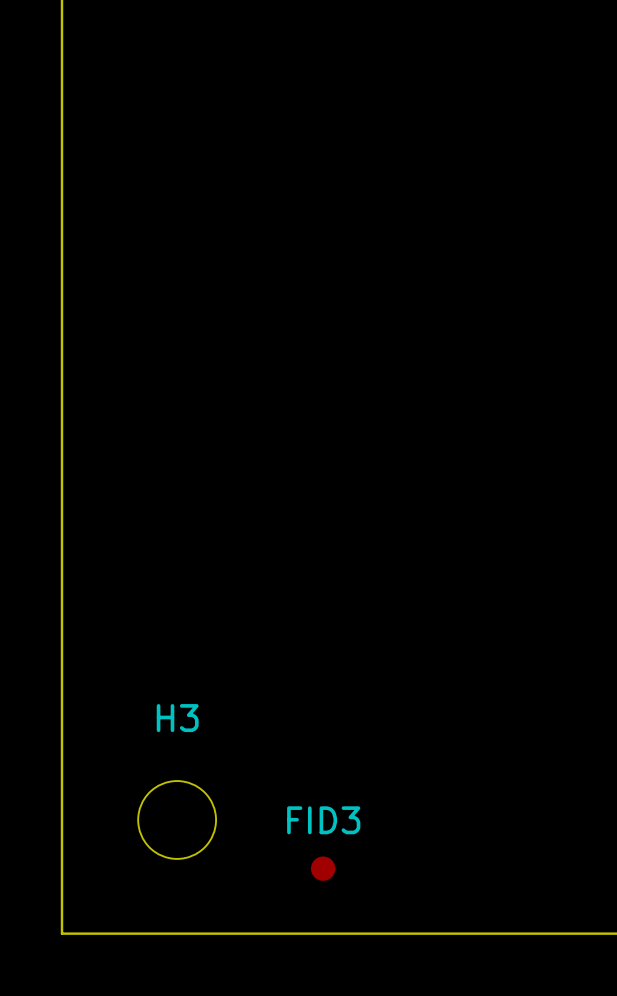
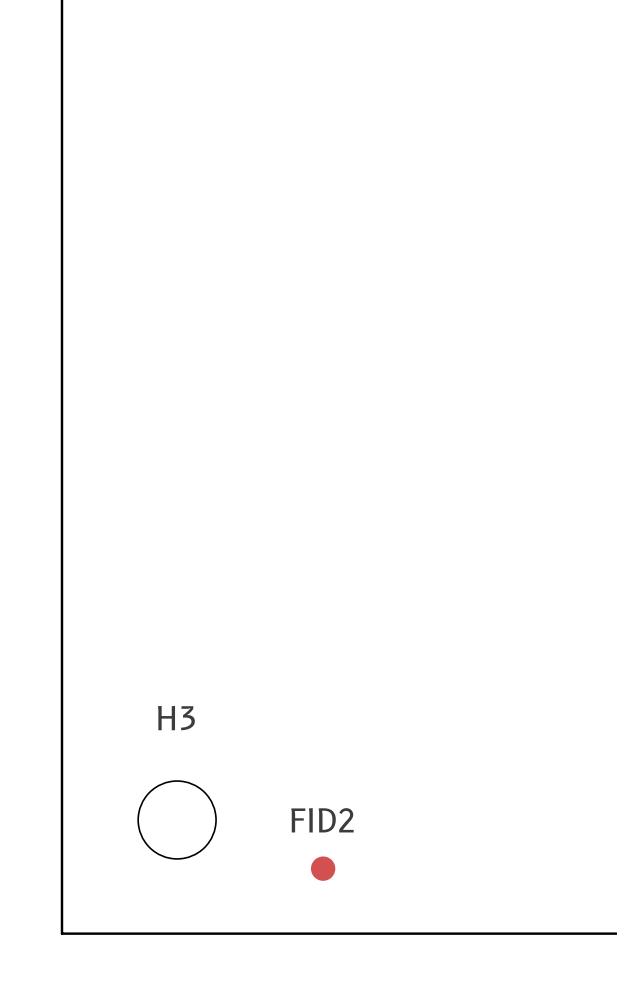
FID3 name: FID3 (323, 820) -> FID2 (322, 820)

